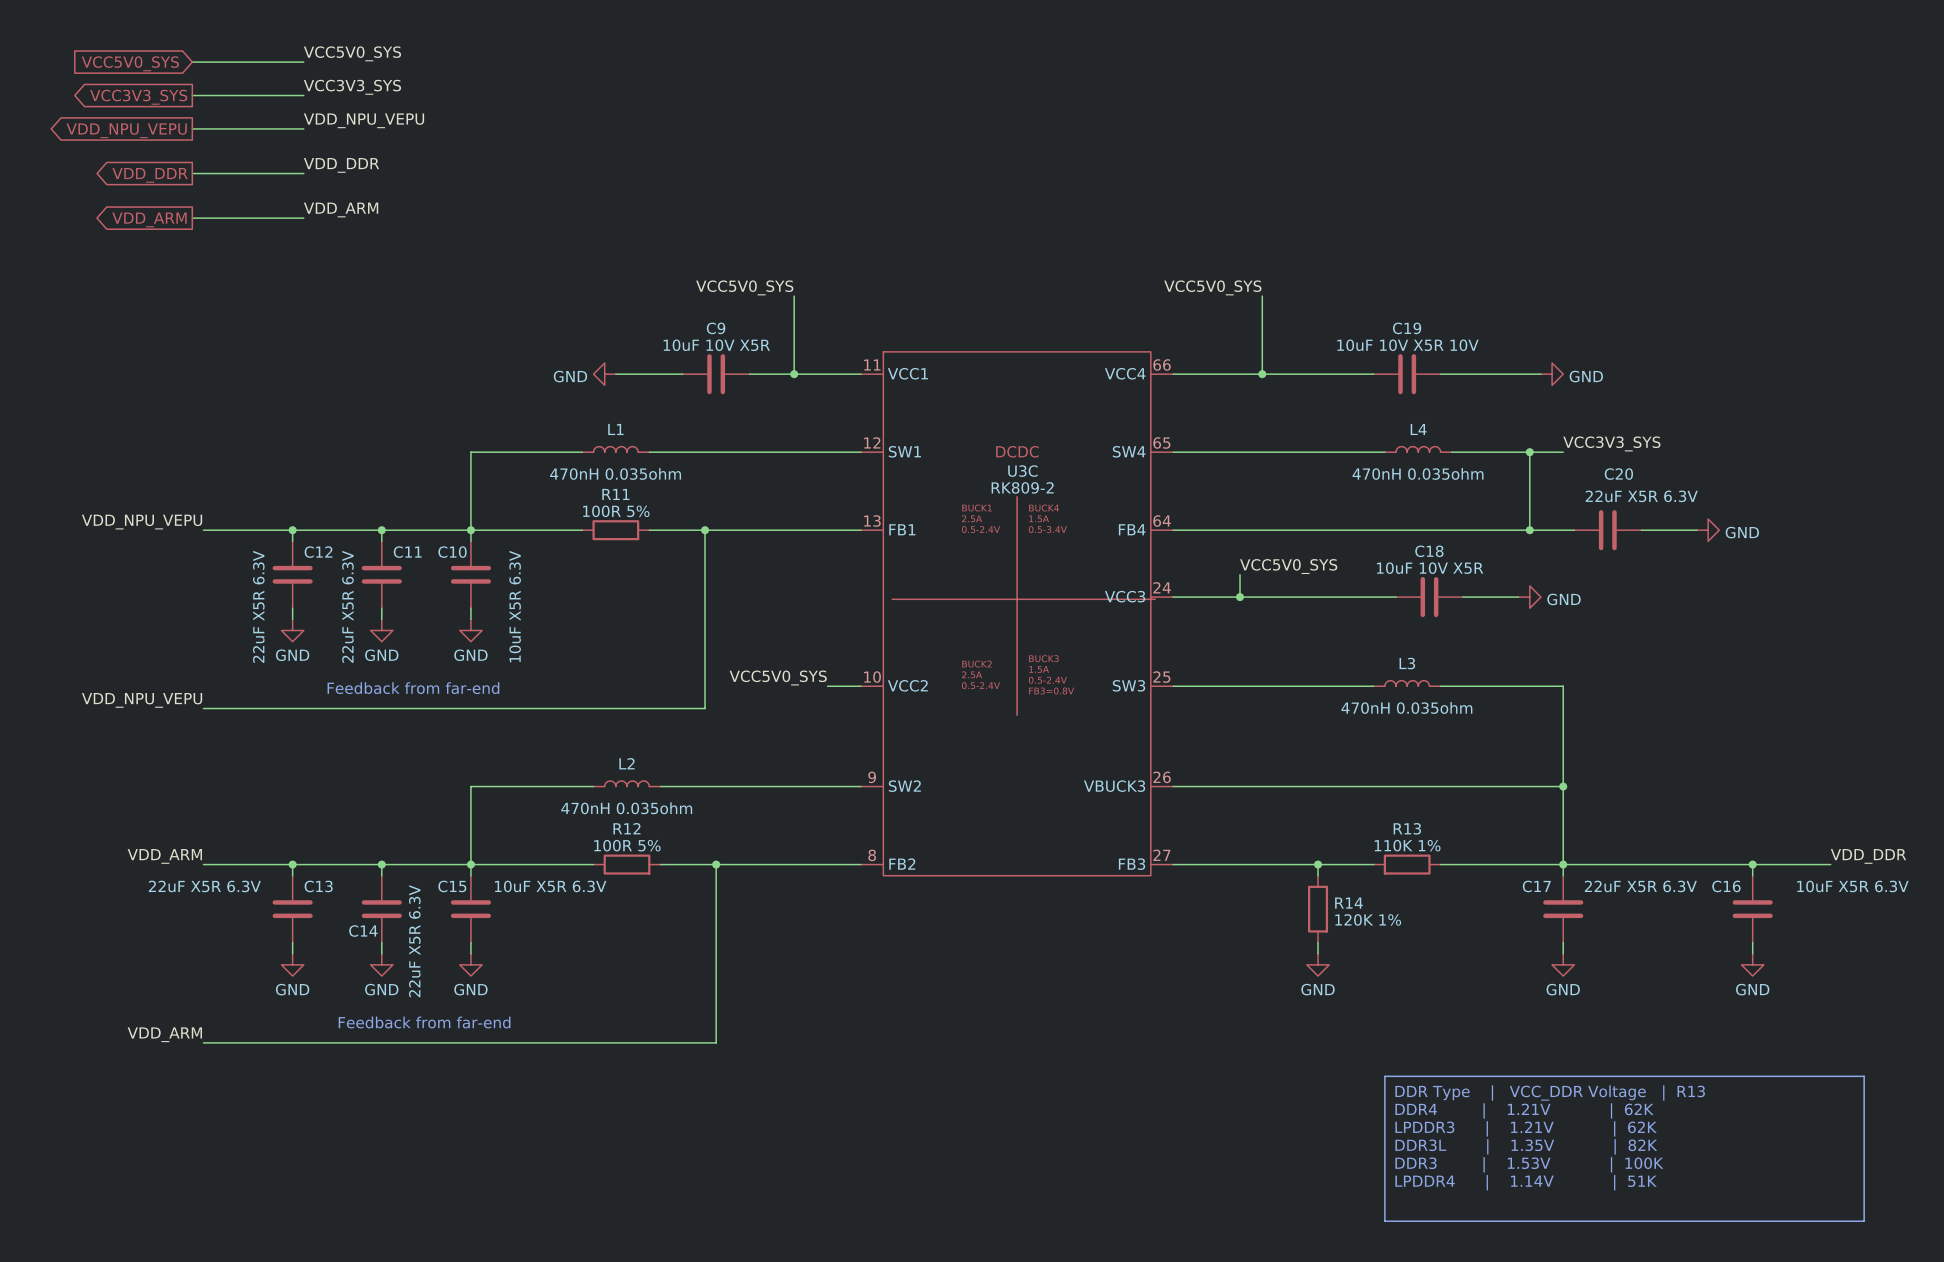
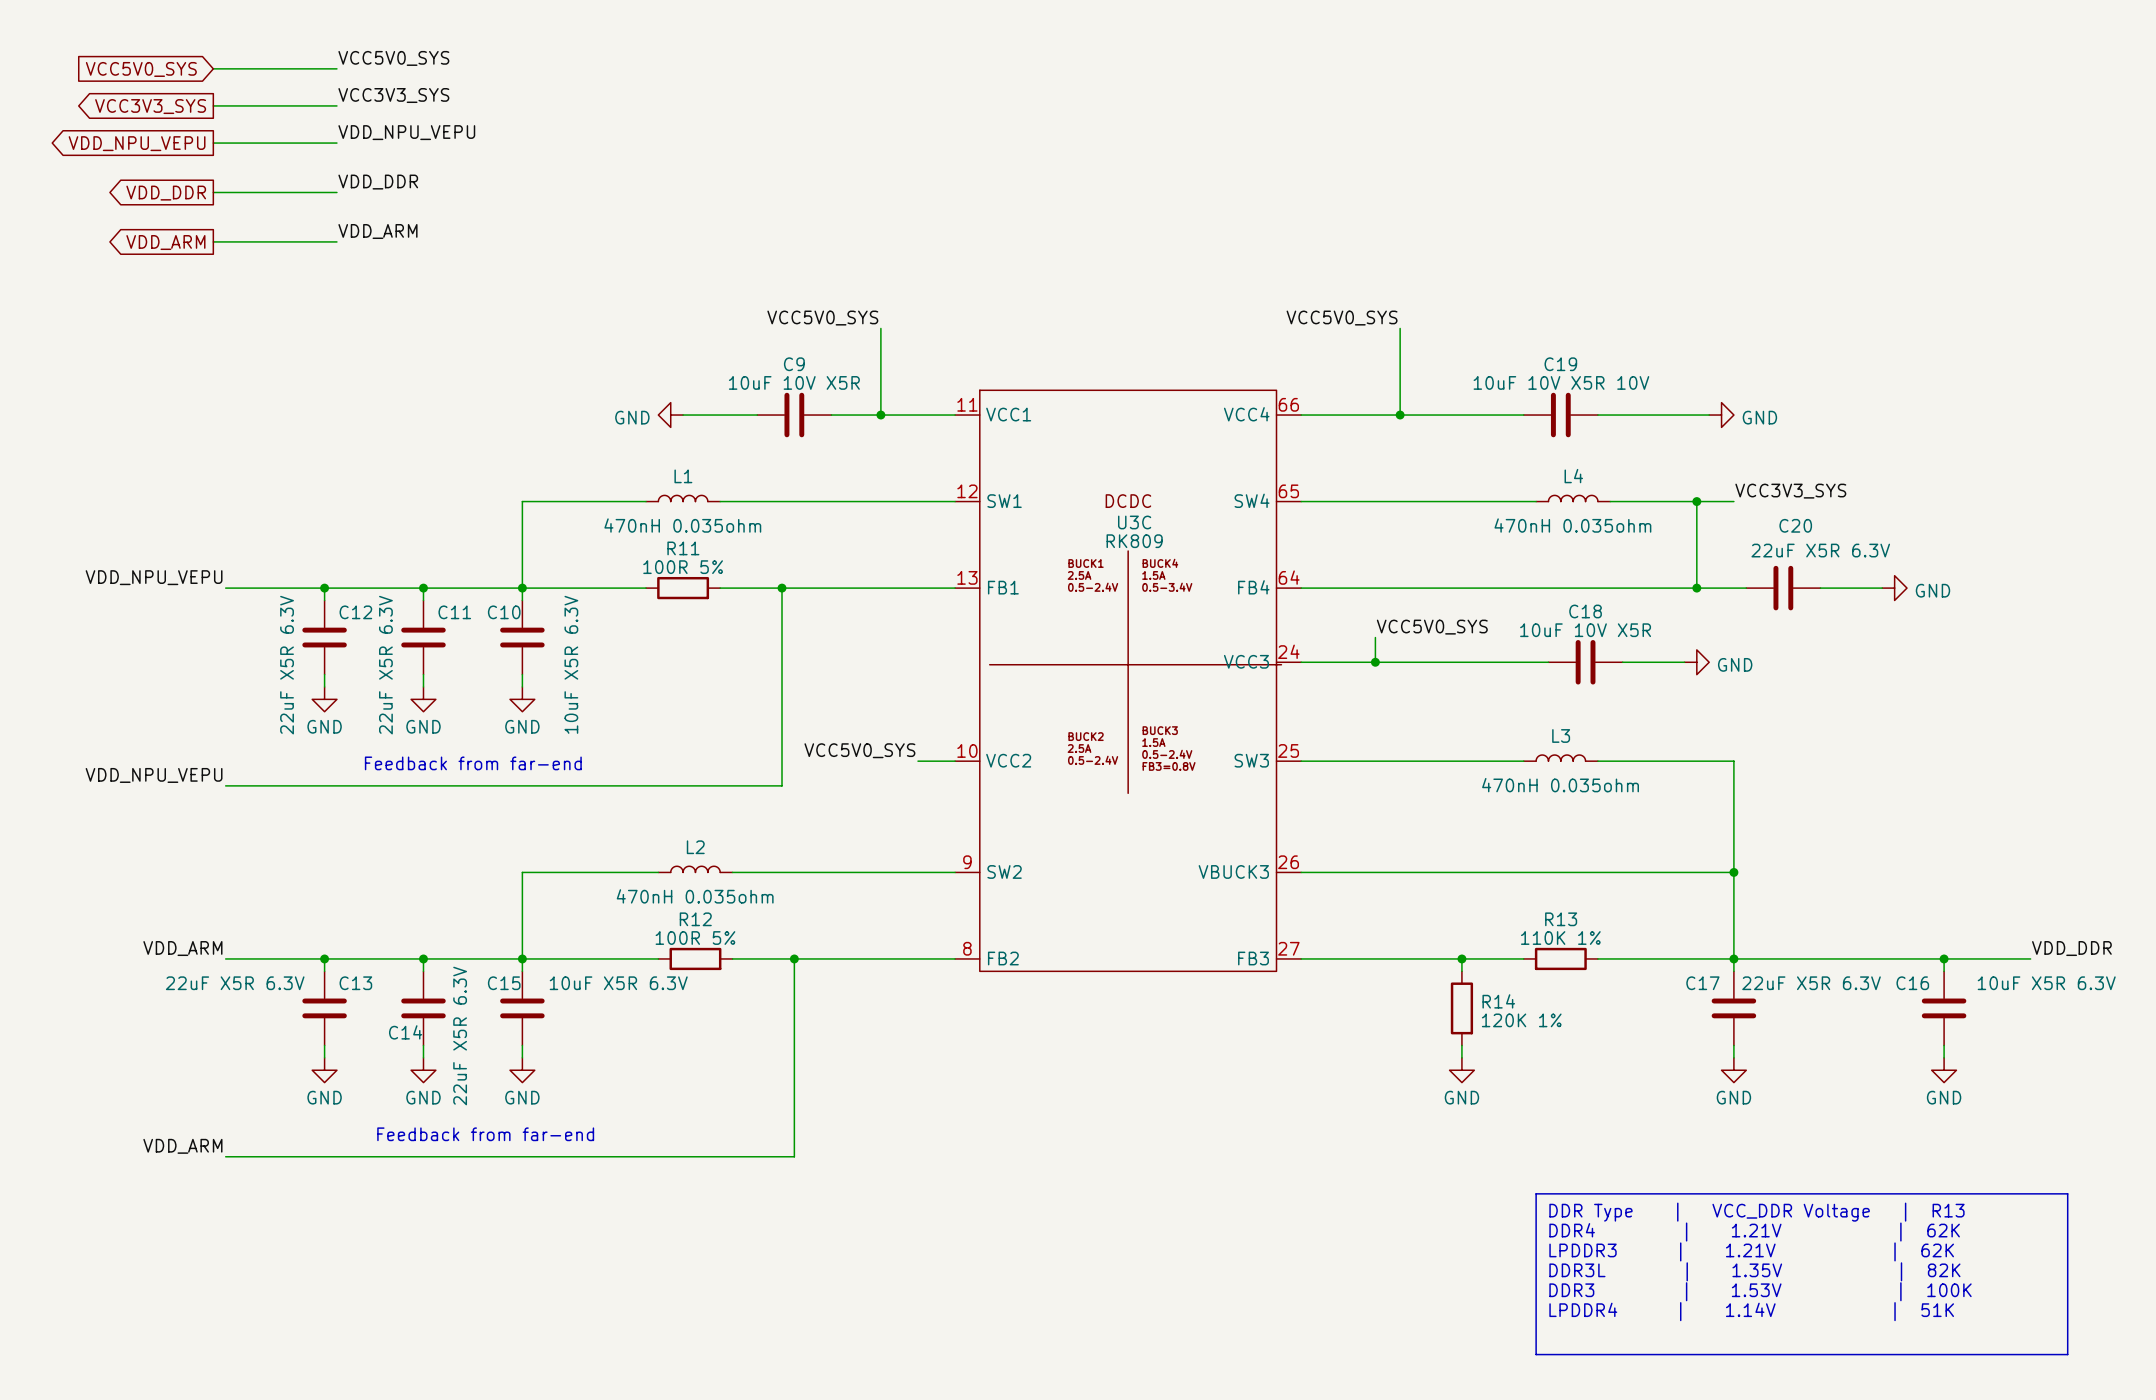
U3C value: RK809-2 (1022, 487) -> RK809 (1134, 541)

